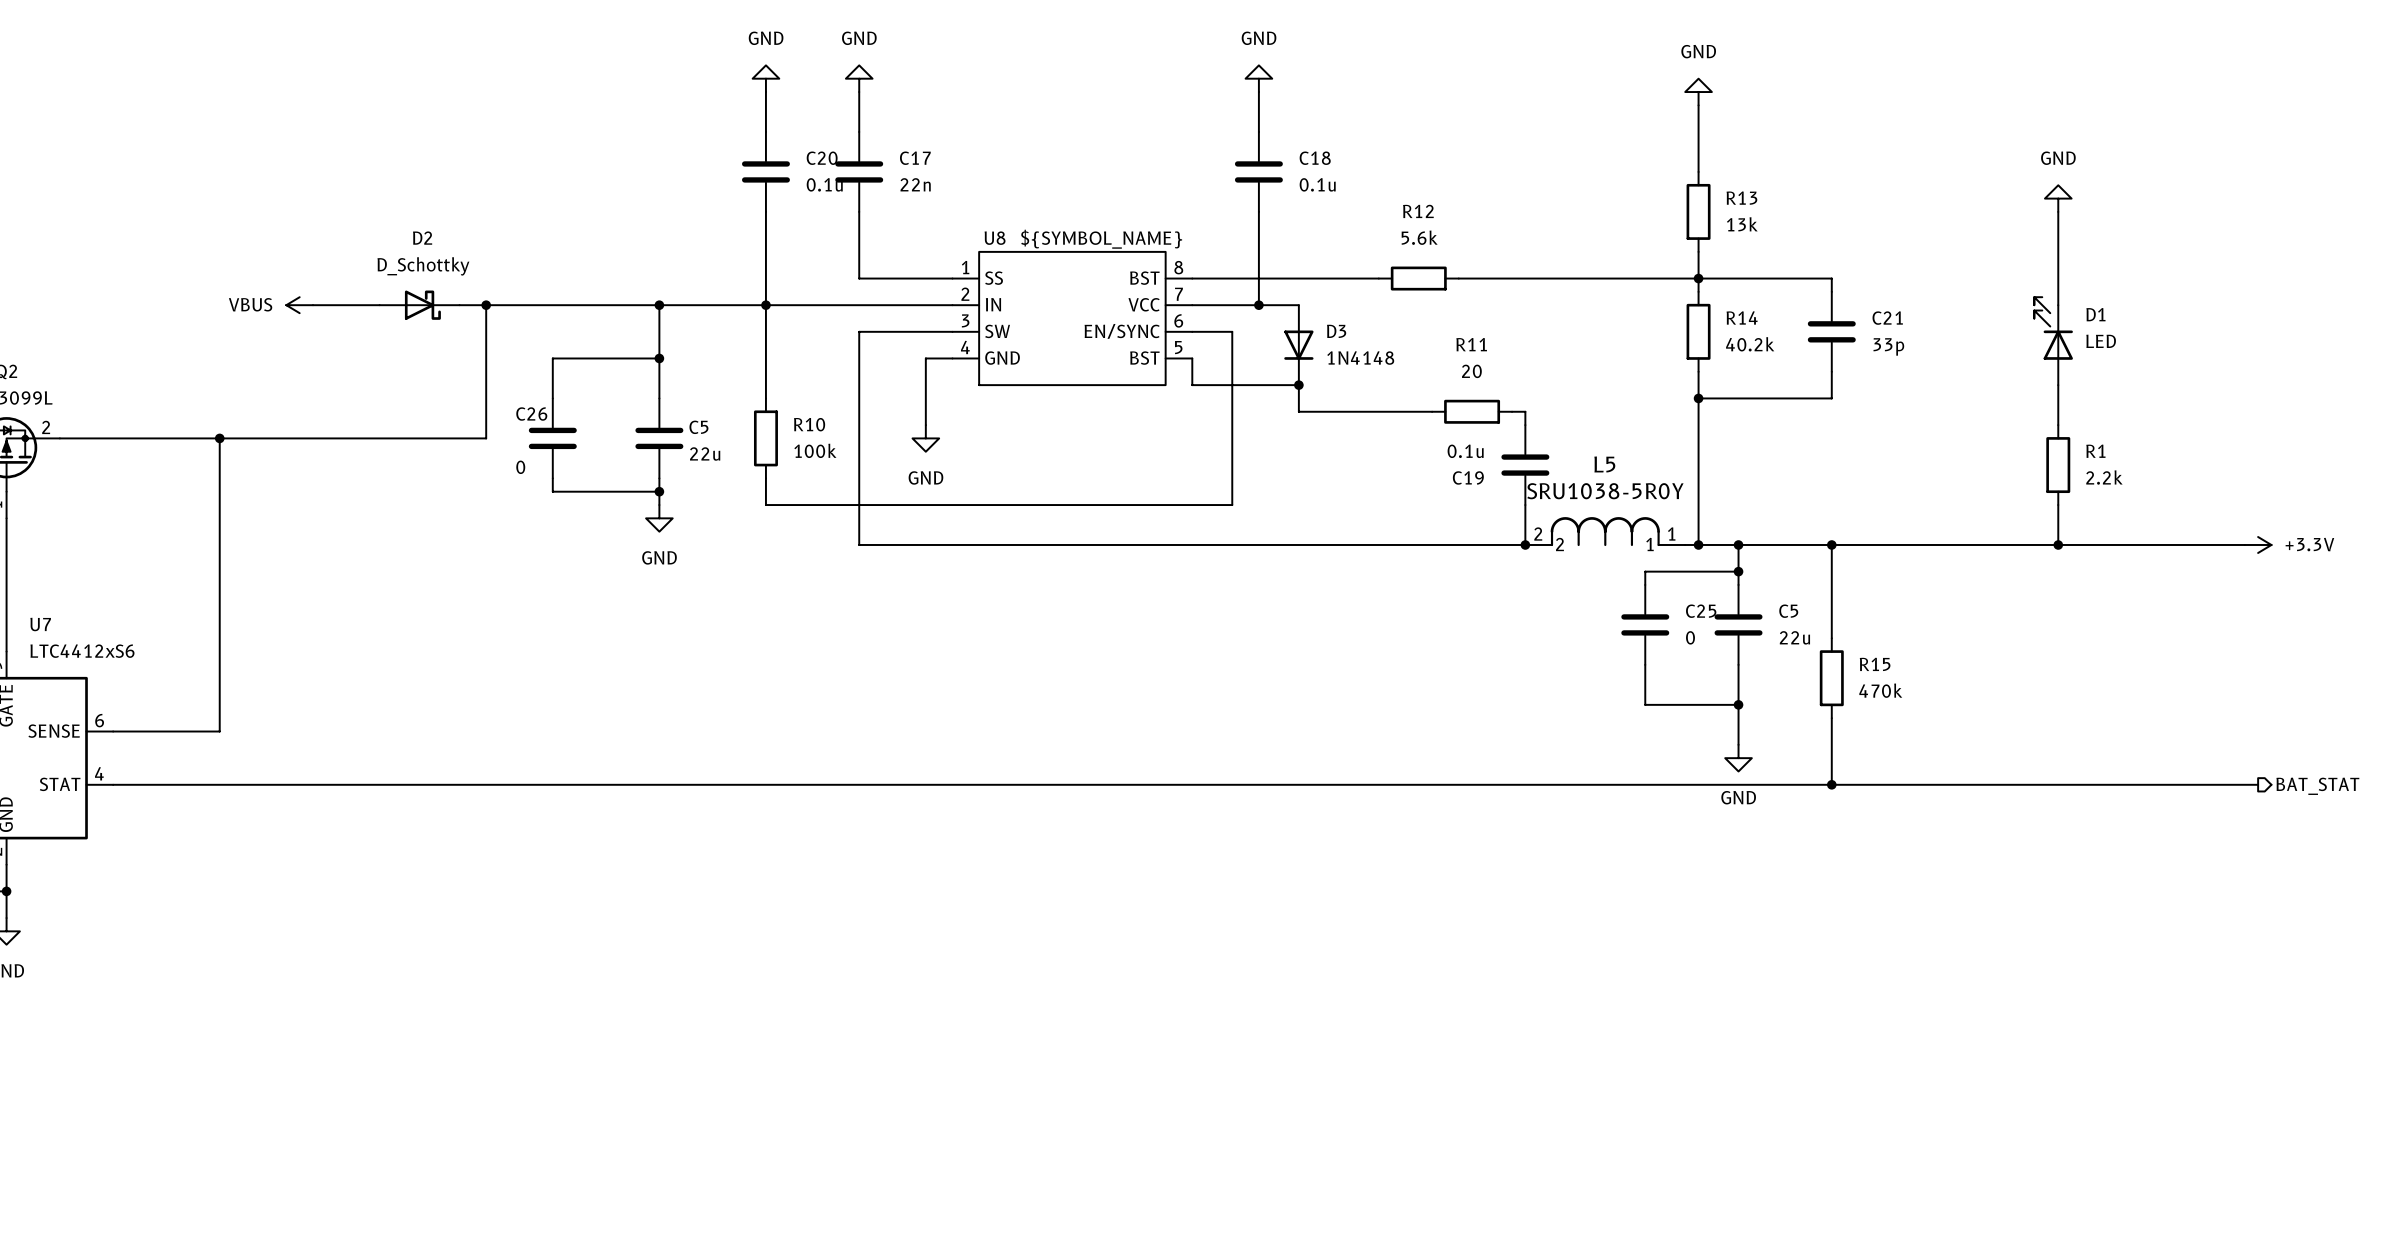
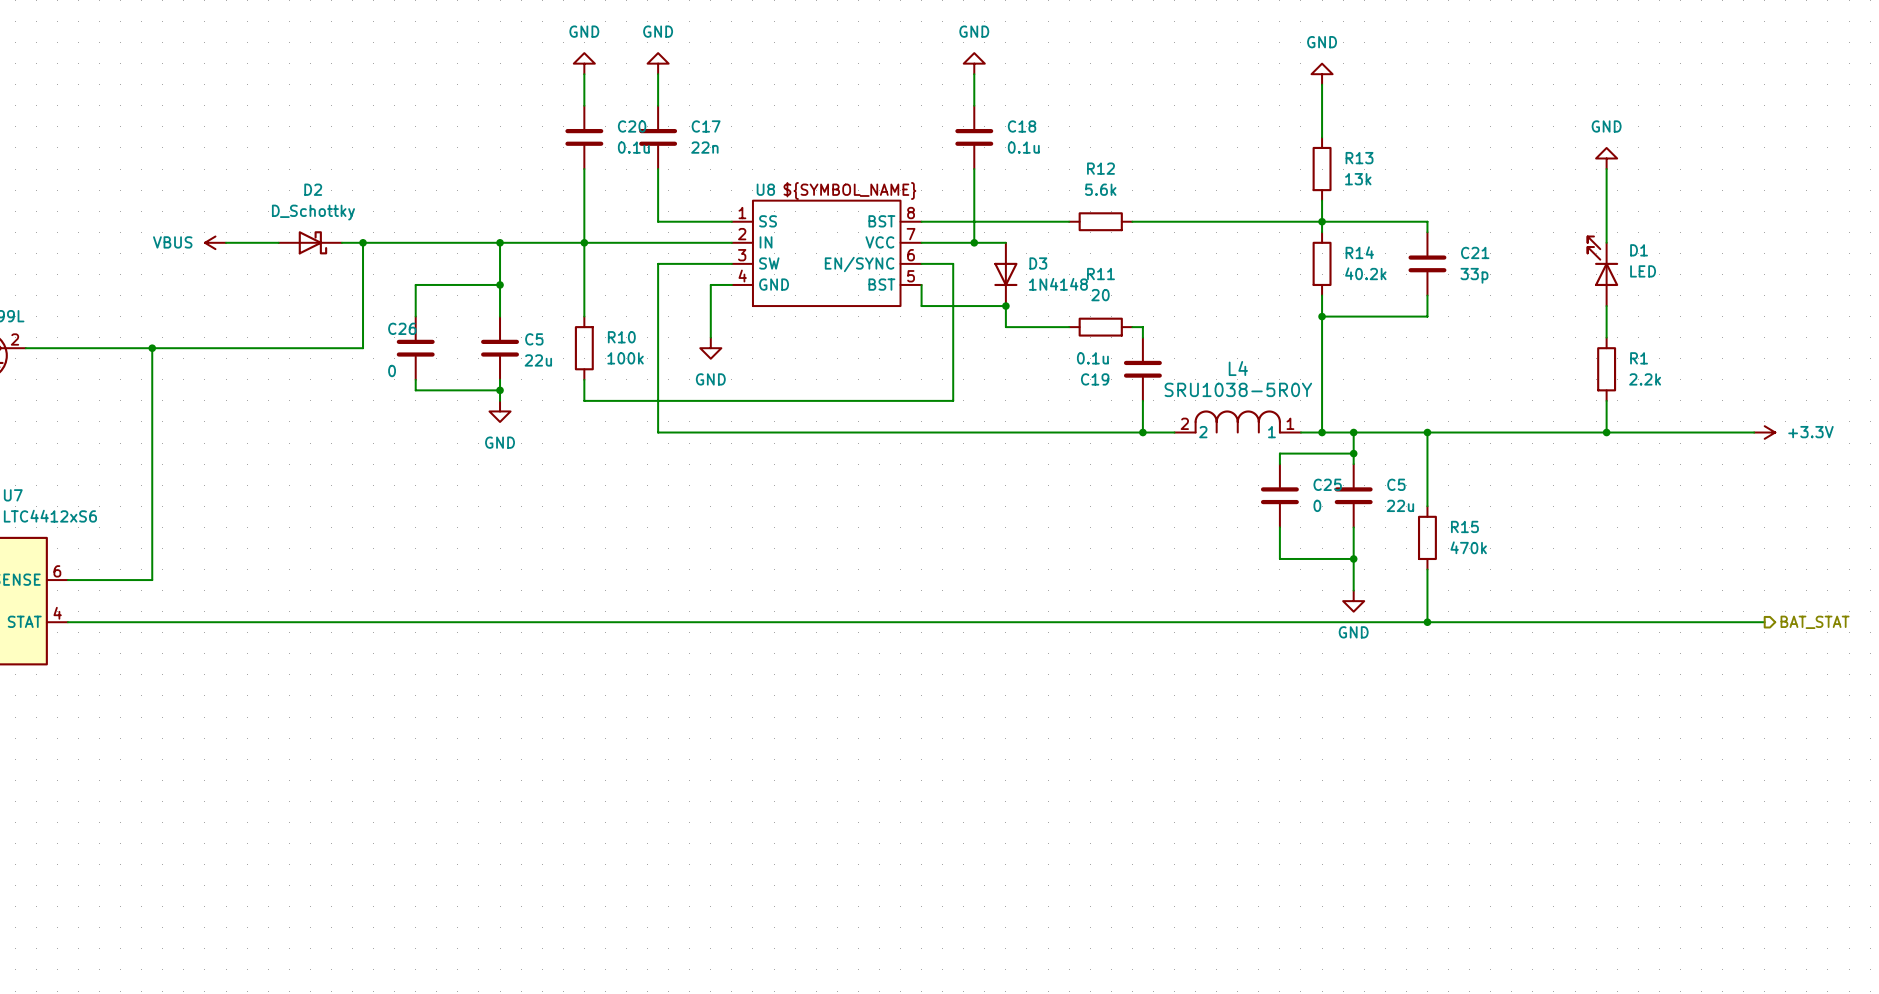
wire: (1378, 411) (1432, 411) -> none
R11 position: (1472, 411) -> (1100, 327)
wire: (1512, 411) (1525, 411) (1525, 425) -> (1132, 327) (1142, 327) (1142, 337)
C19 position: (1525, 465) -> (1142, 369)
wire: none -> (1142, 400) (1142, 432)
wire: (1525, 505) (1525, 544) (1512, 544) -> none
L4: none -> SRU1038-5R0Y (1237, 421)
L5: SRU1038-5R0Y (1605, 531) -> none
junction position: (1525, 544) -> (1142, 432)

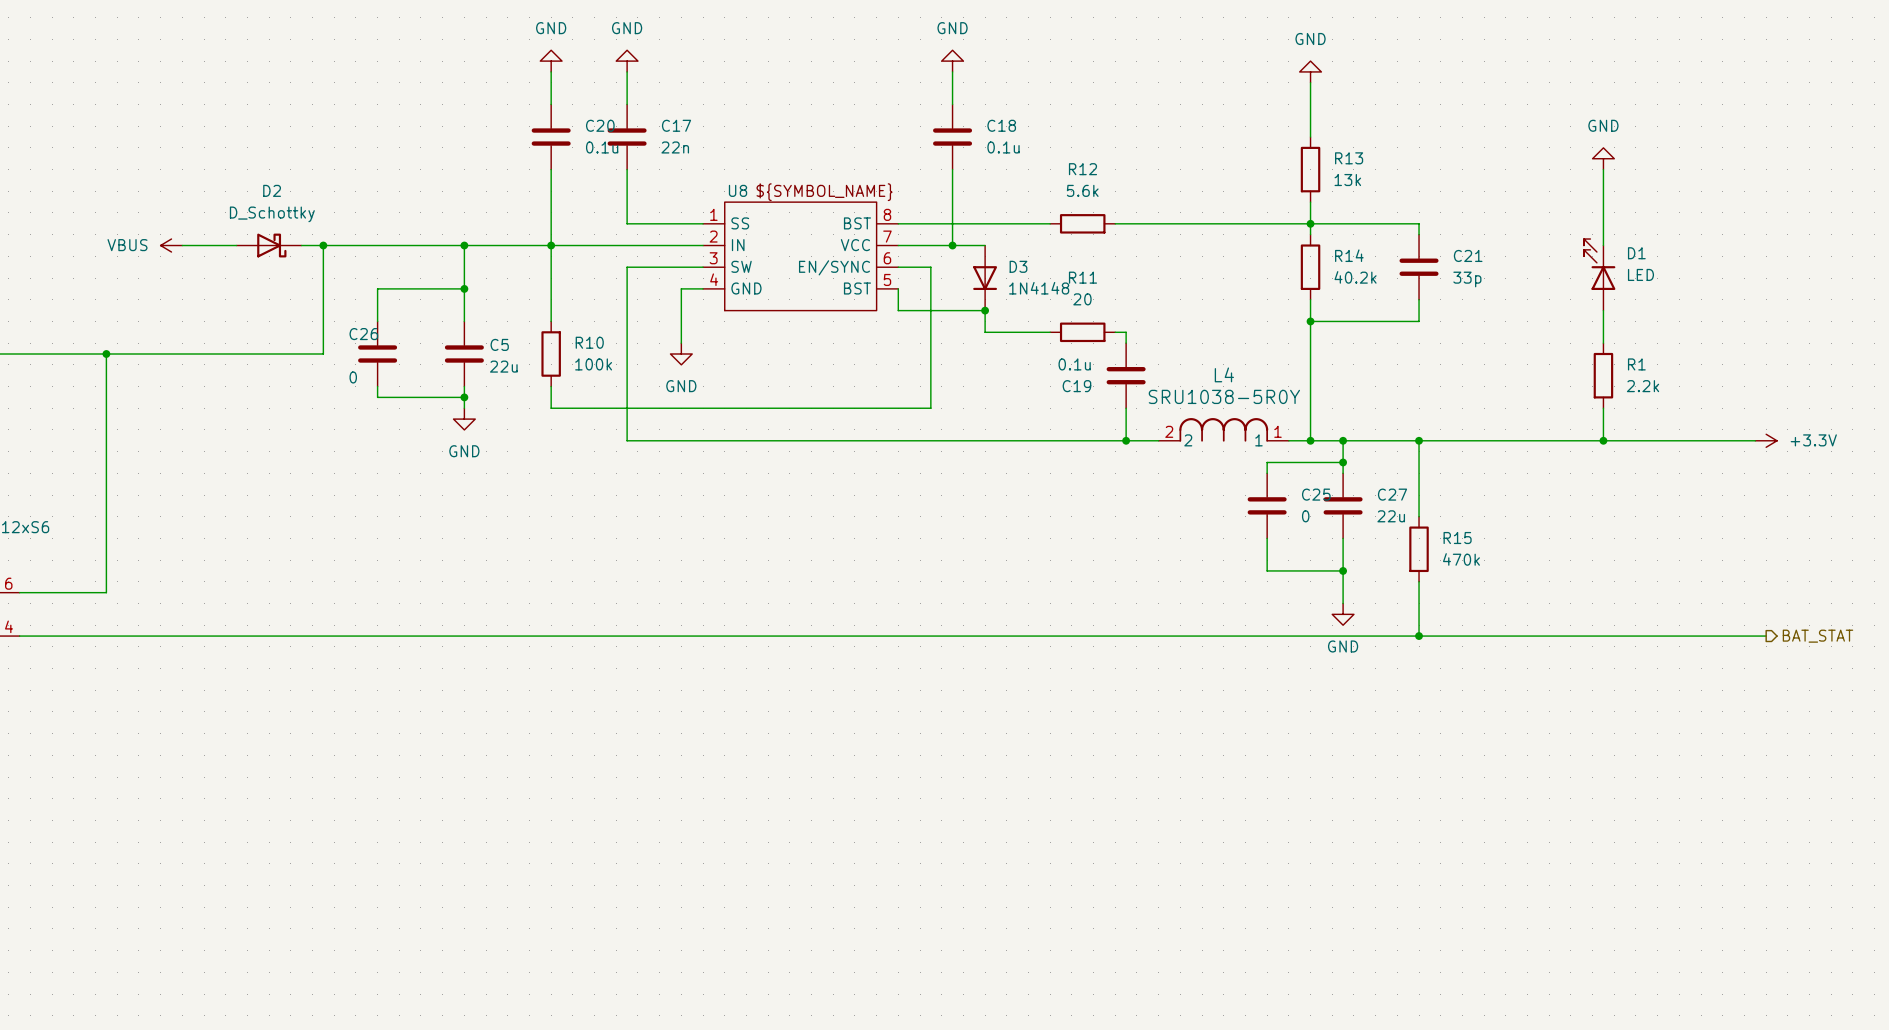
C5 name: C5 (1396, 484) -> C27 (1392, 494)

